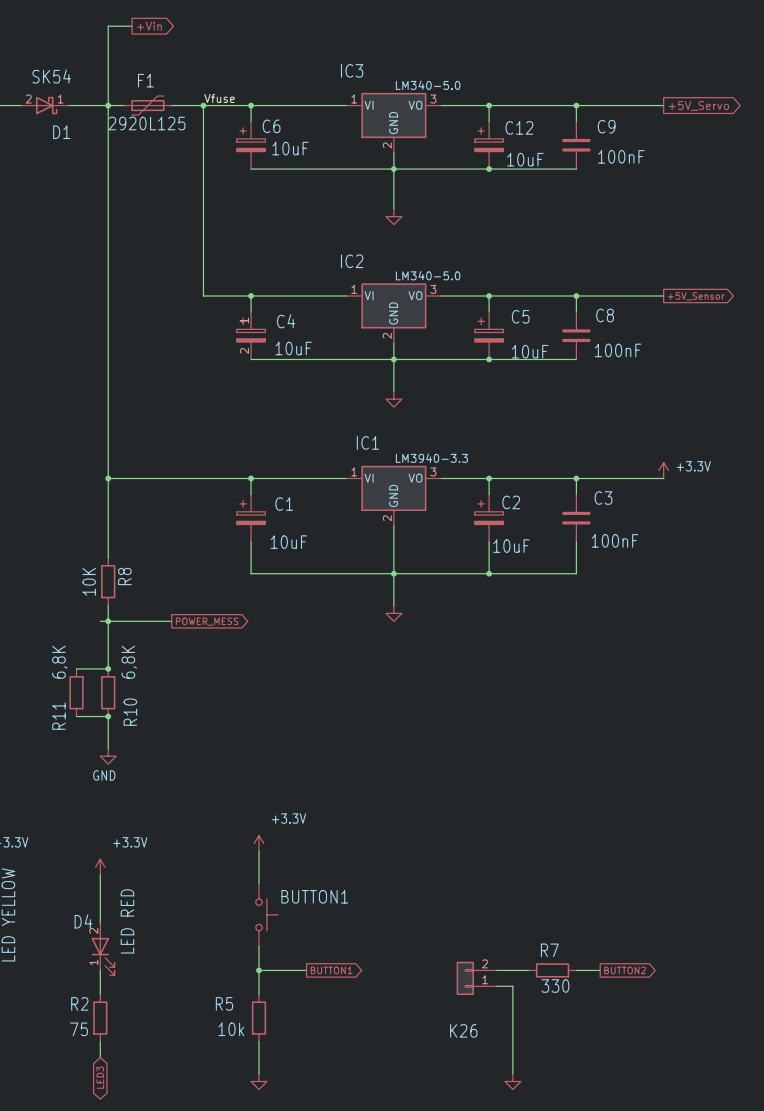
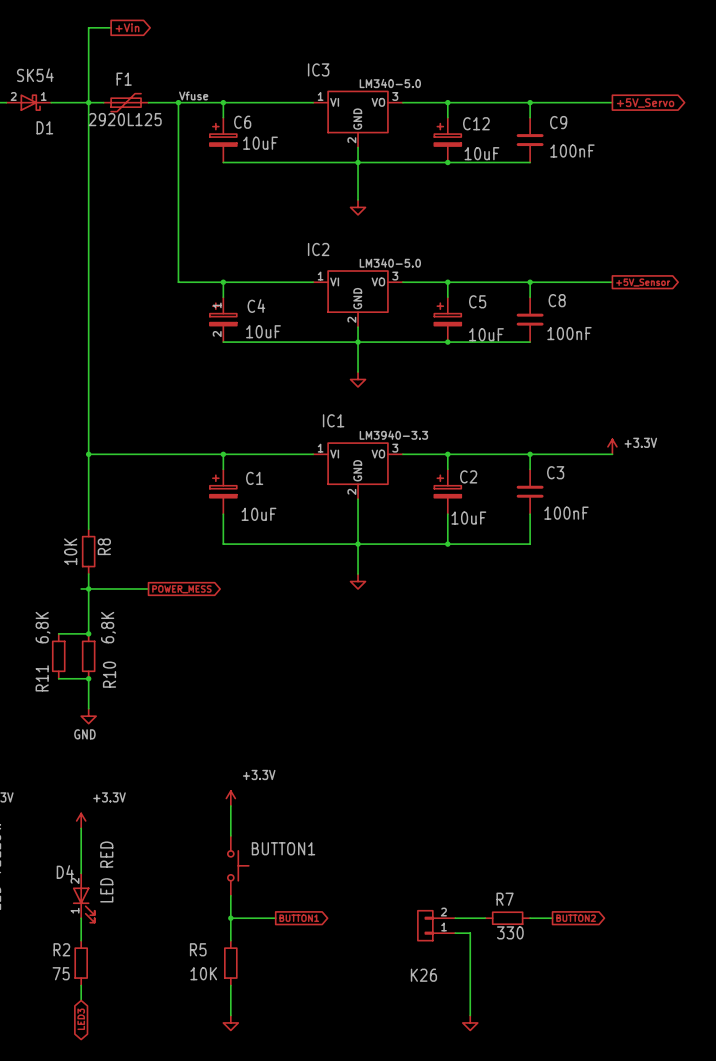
R5 value: 10k (231, 1029) -> 10K (203, 973)

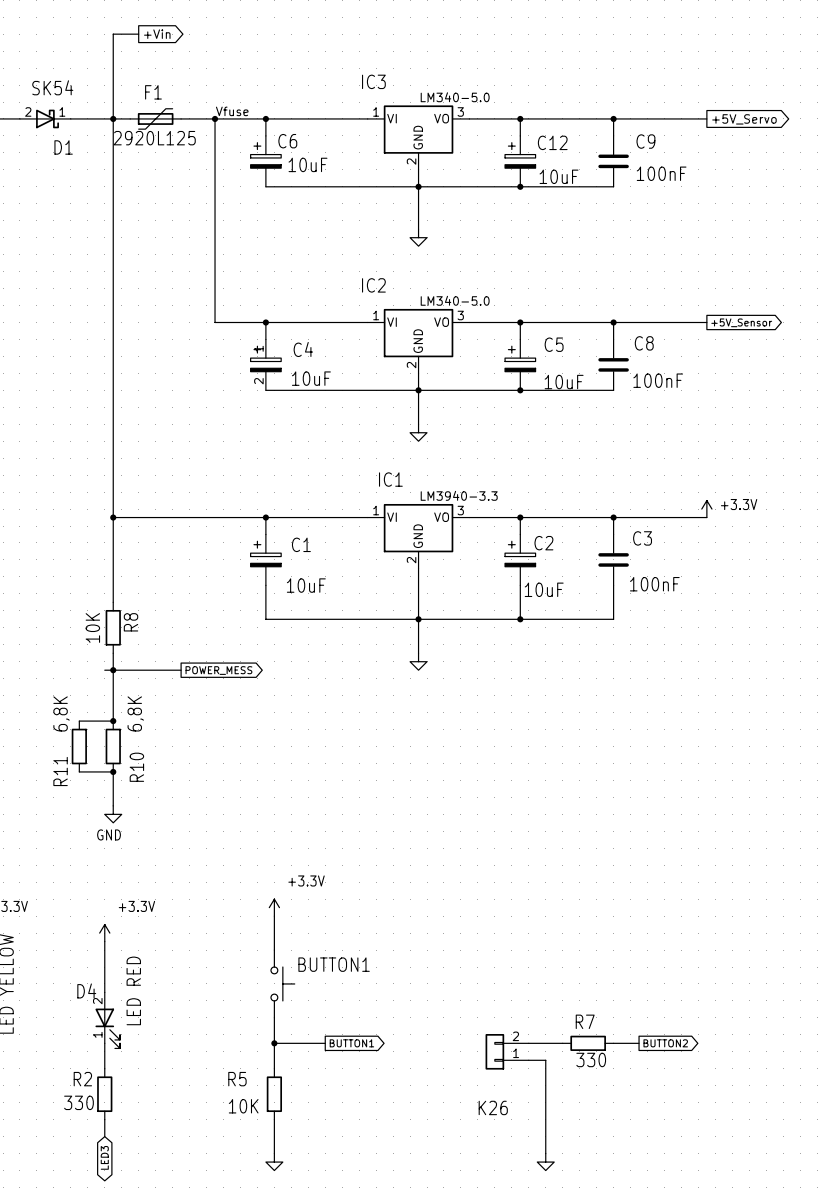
R2 value: 75 (61, 973) -> 330 (78, 1102)

